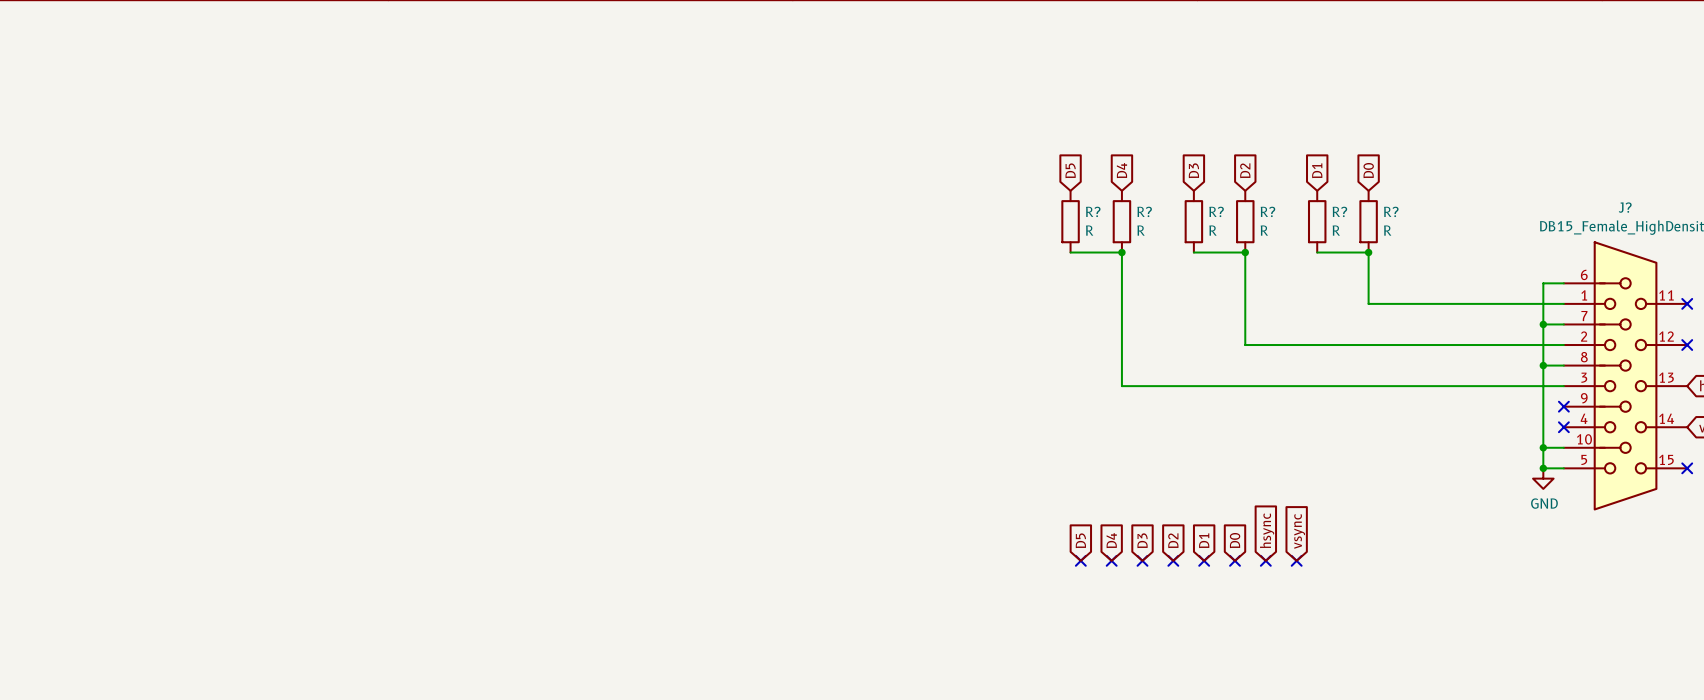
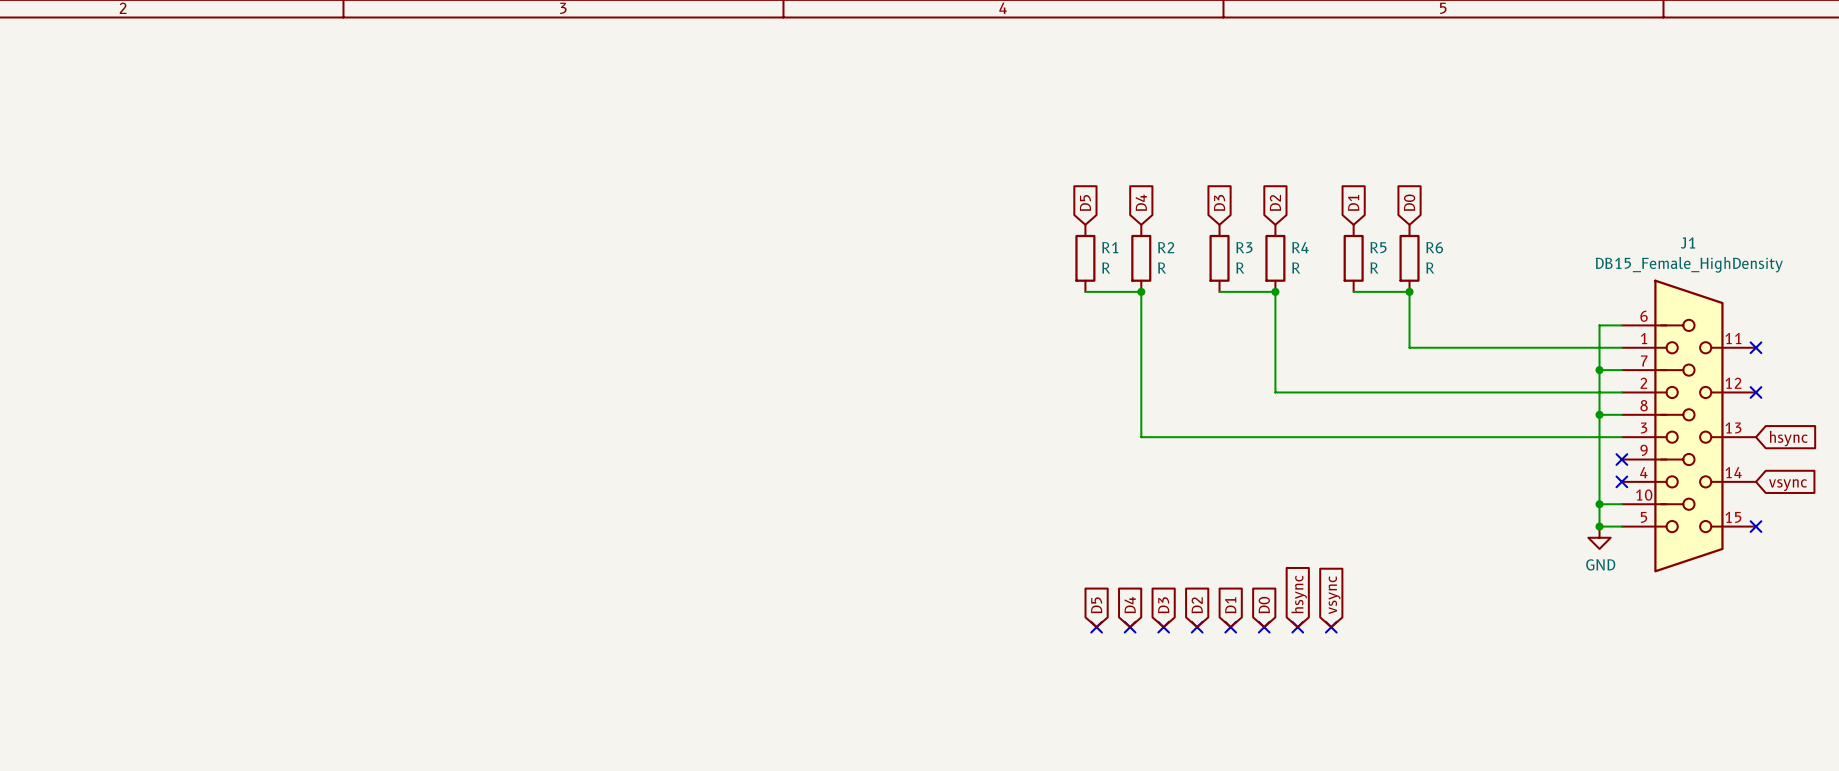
J? name: J? (1625, 207) -> J1 (1688, 243)
R? name: R? (1093, 211) -> R1 (1110, 247)
R? name: R? (1144, 211) -> R2 (1166, 247)
R? name: R? (1216, 211) -> R3 (1244, 247)
R? name: R? (1267, 211) -> R4 (1300, 247)
R? name: R? (1339, 211) -> R5 (1378, 247)
R? name: R? (1391, 211) -> R6 (1434, 247)

